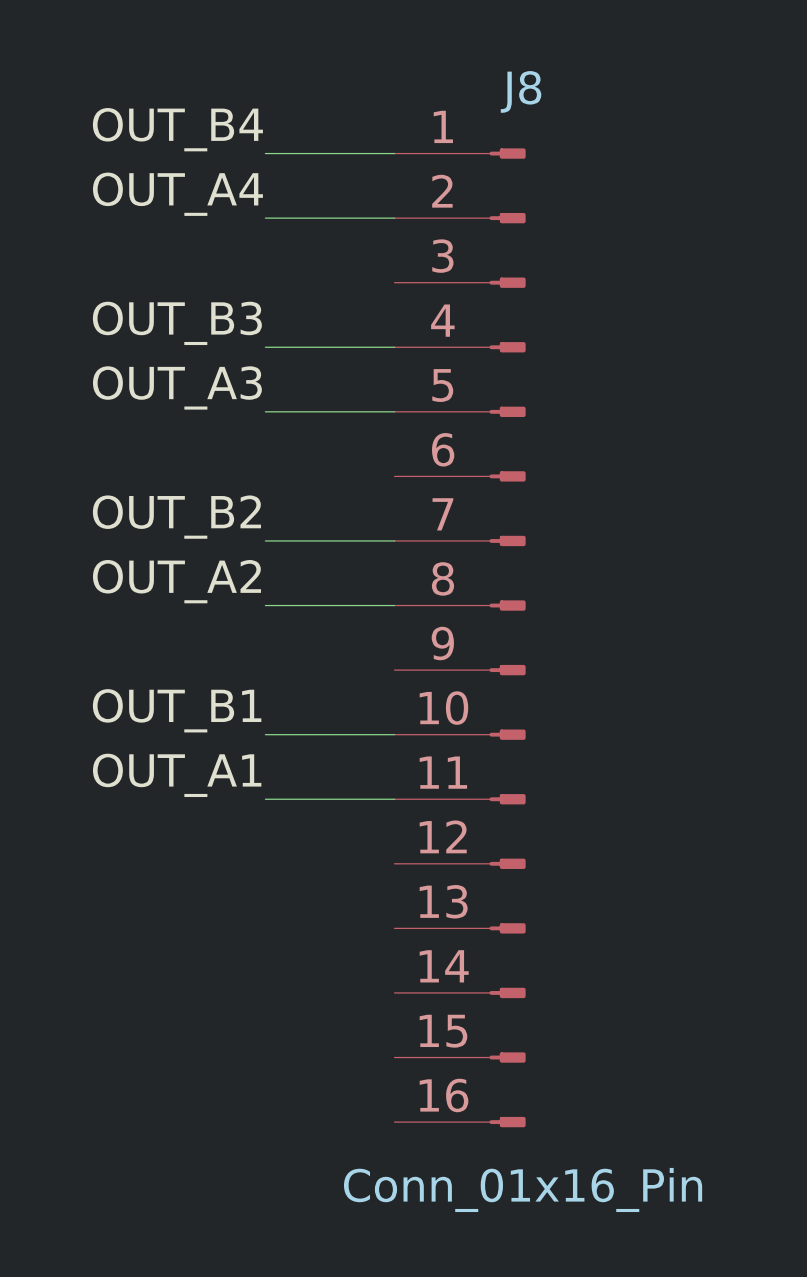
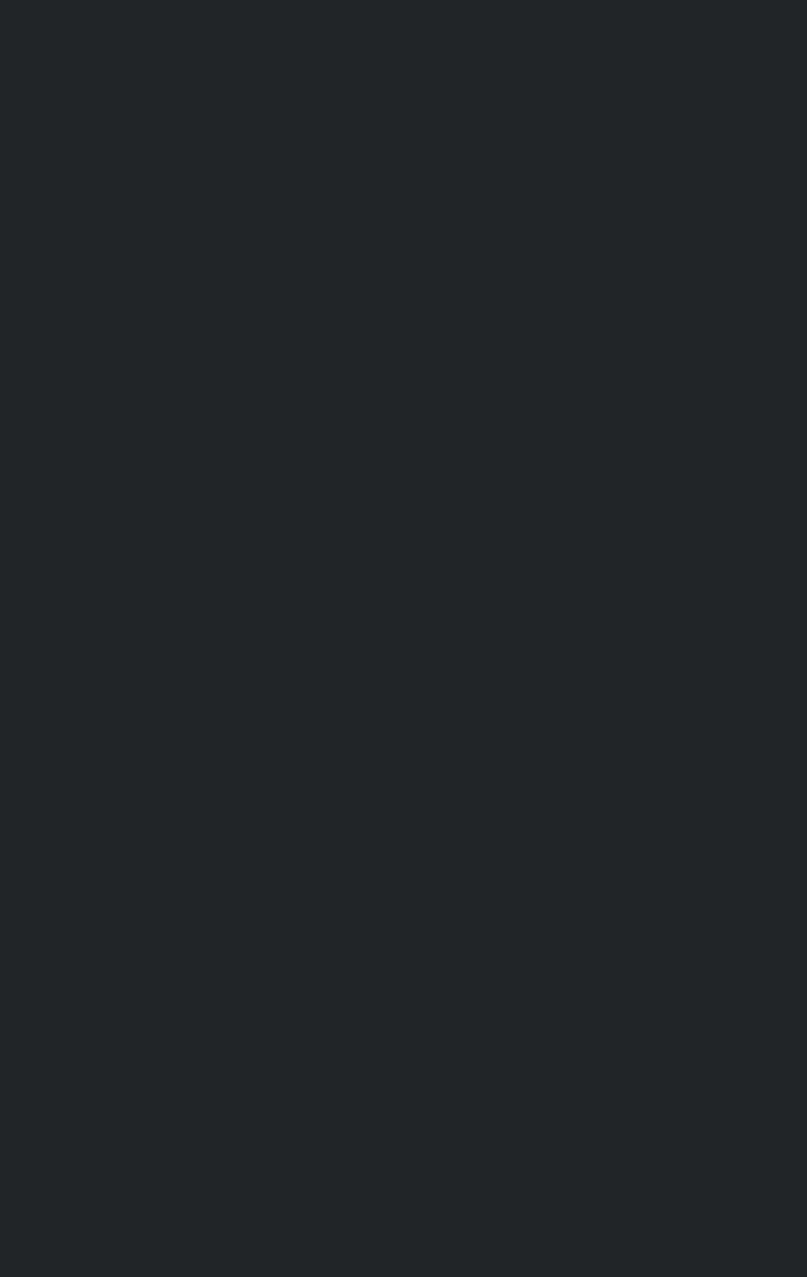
label: OUT_B4 (177, 129) -> none
wire: (265, 153) (394, 153) -> none
label: OUT_A4 (177, 194) -> none
wire: (265, 218) (394, 218) -> none
label: OUT_B3 (177, 323) -> none
wire: (265, 347) (394, 347) -> none
label: OUT_A3 (177, 387) -> none
wire: (265, 411) (394, 411) -> none
label: OUT_B2 (176, 517) -> none
wire: (265, 540) (394, 540) -> none
label: OUT_A2 (176, 581) -> none
wire: (265, 605) (394, 605) -> none
J8: Conn_01x16_Pin (460, 637) -> none
label: OUT_B1 (177, 710) -> none
wire: (265, 734) (394, 734) -> none
label: OUT_A1 (177, 775) -> none
wire: (265, 799) (394, 799) -> none

